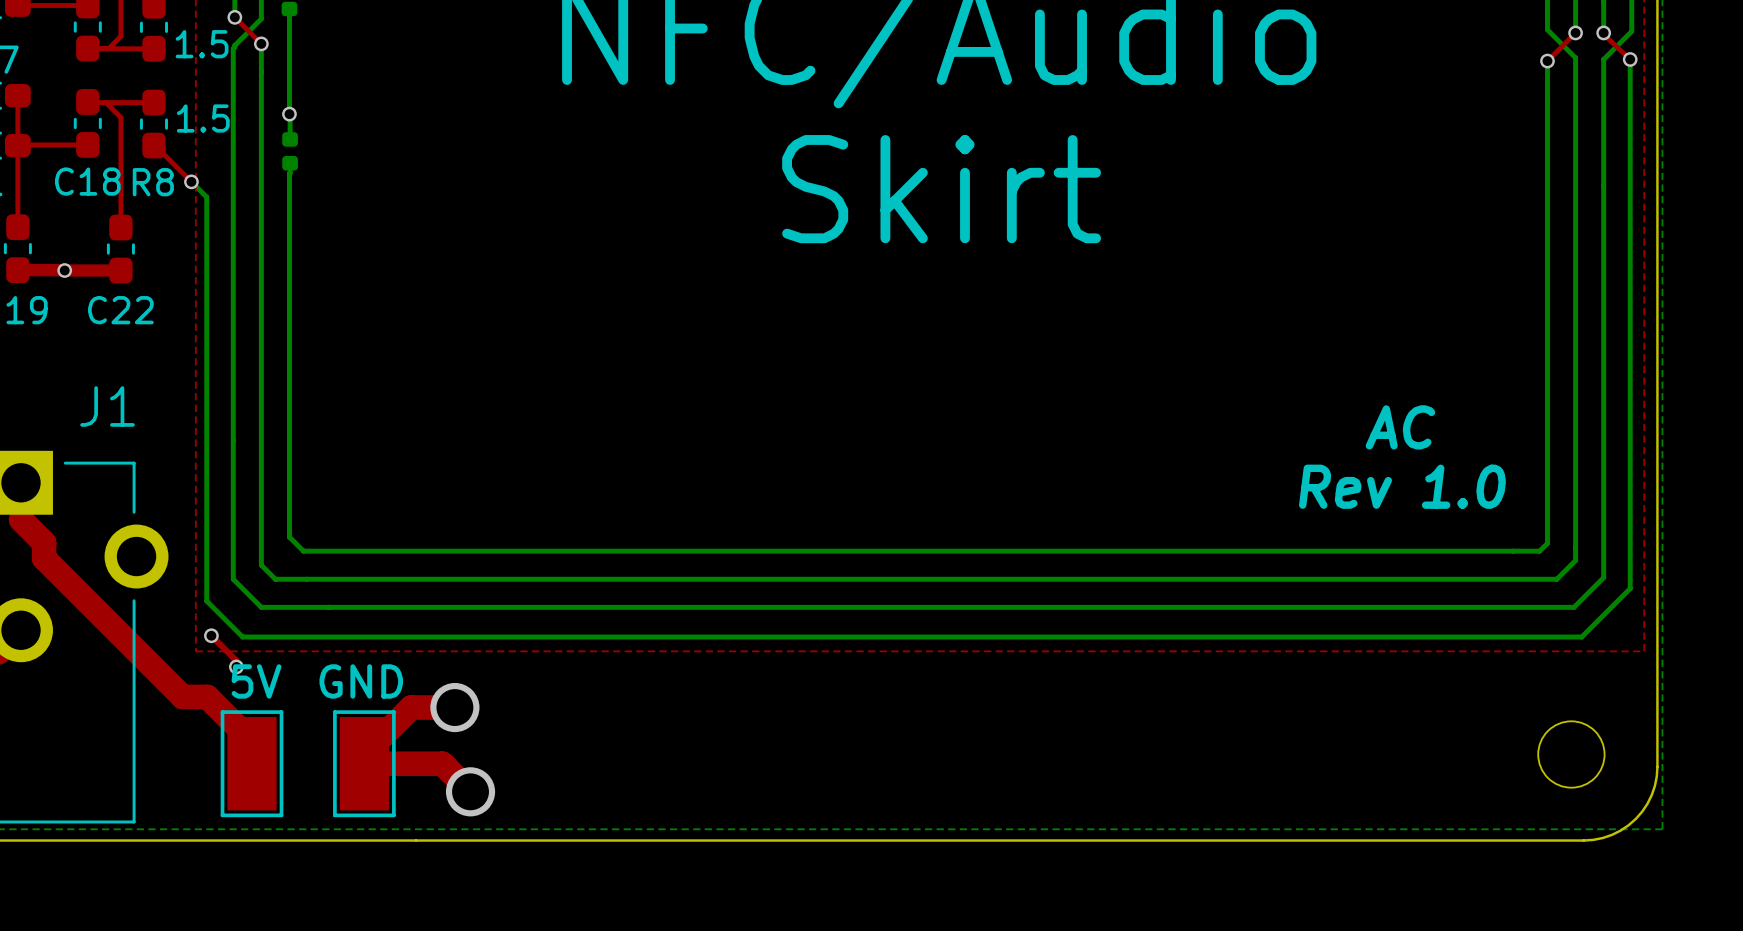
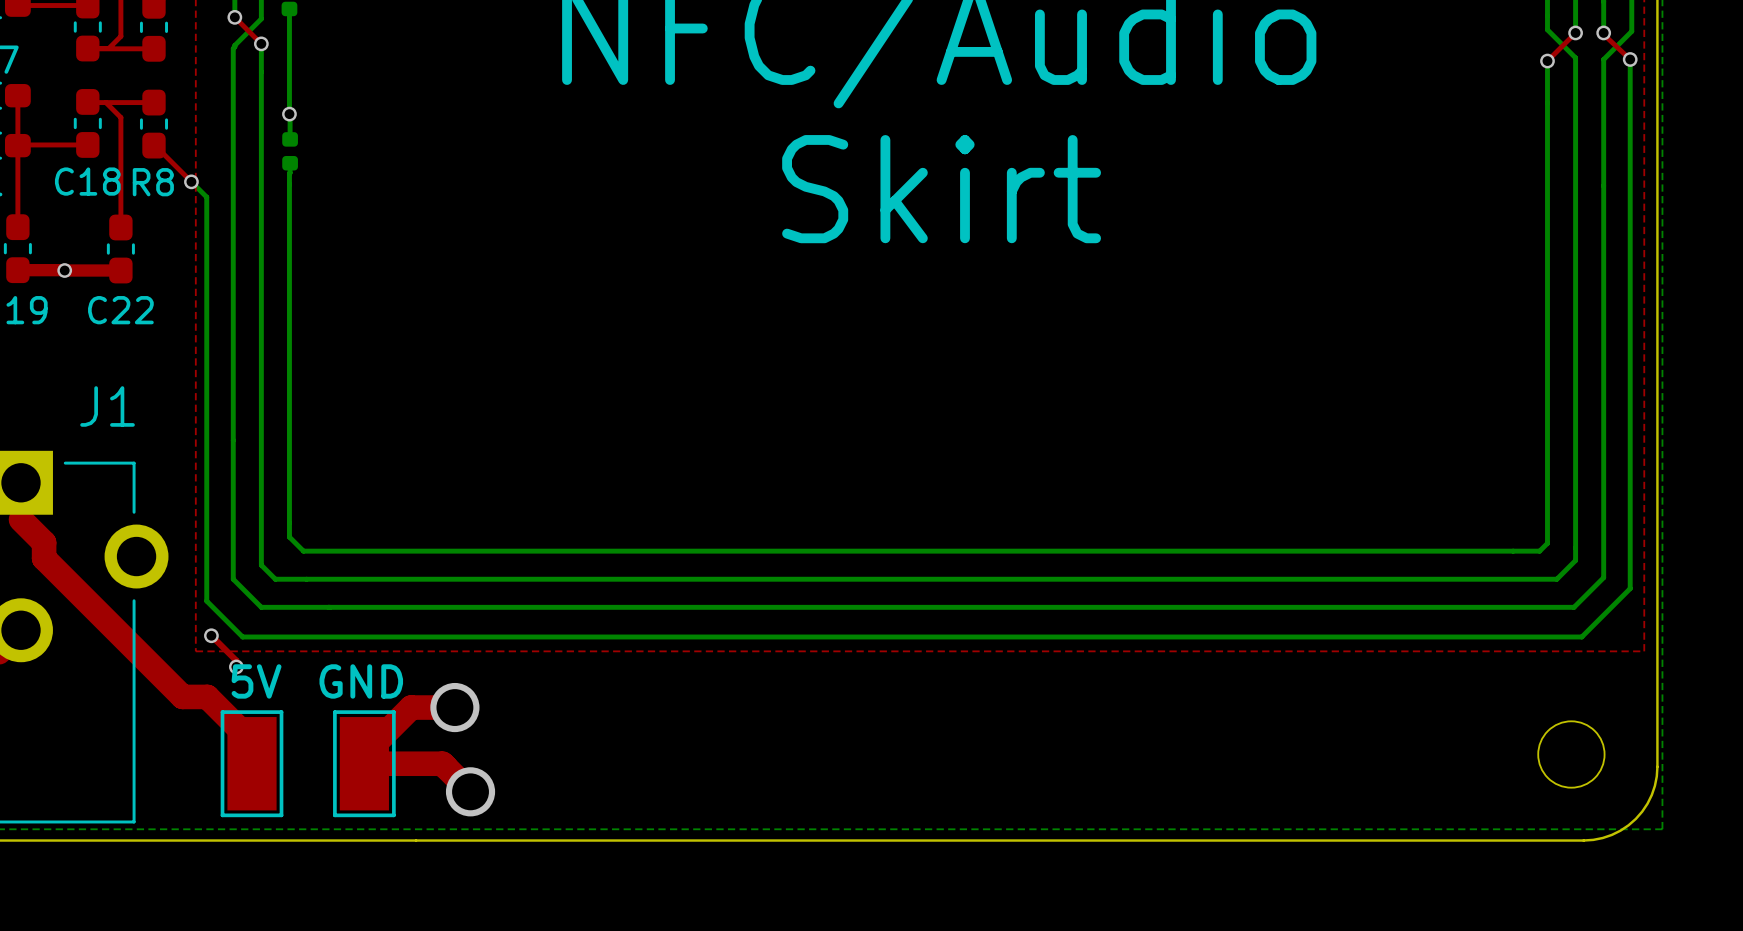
part value: 1.5 (202, 44) -> none
R8 value: 1.5 (203, 118) -> none
text: AC (1400, 427) -> none
text: Rev 1.0 (1402, 486) -> none

